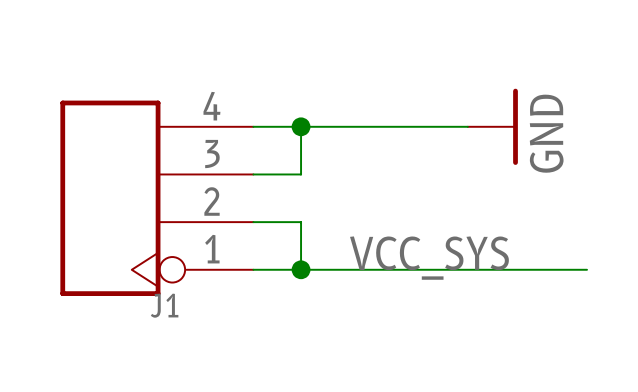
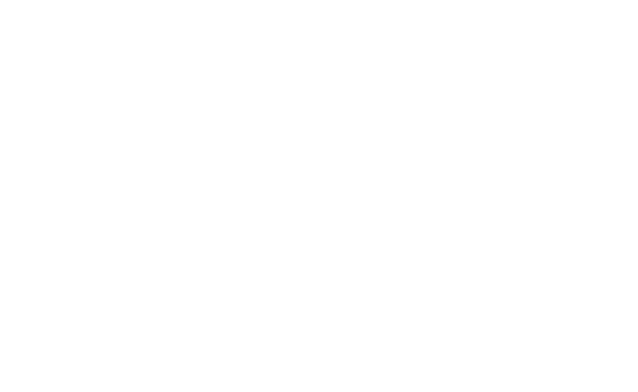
wire: (253, 126) (467, 126) -> none
wire: (301, 126) (301, 174) (253, 174) -> none
junction: (301, 126) -> none
power symbol: GND (492, 126) -> none
J1: (156, 198) -> none
wire: (253, 222) (301, 222) (301, 269) -> none
label: VCC_SYS (429, 258) -> none
wire: (253, 269) (587, 269) -> none
junction: (301, 269) -> none

